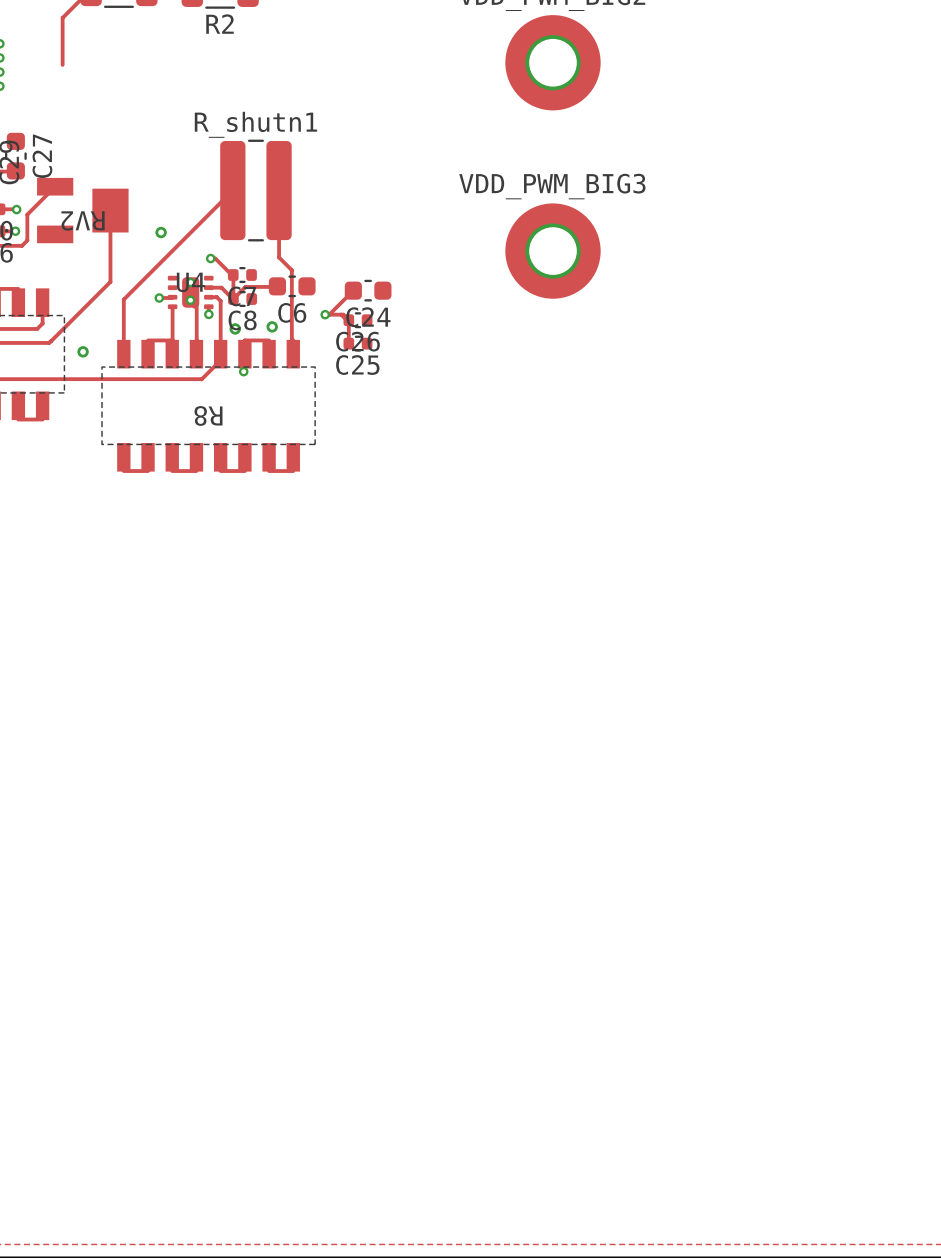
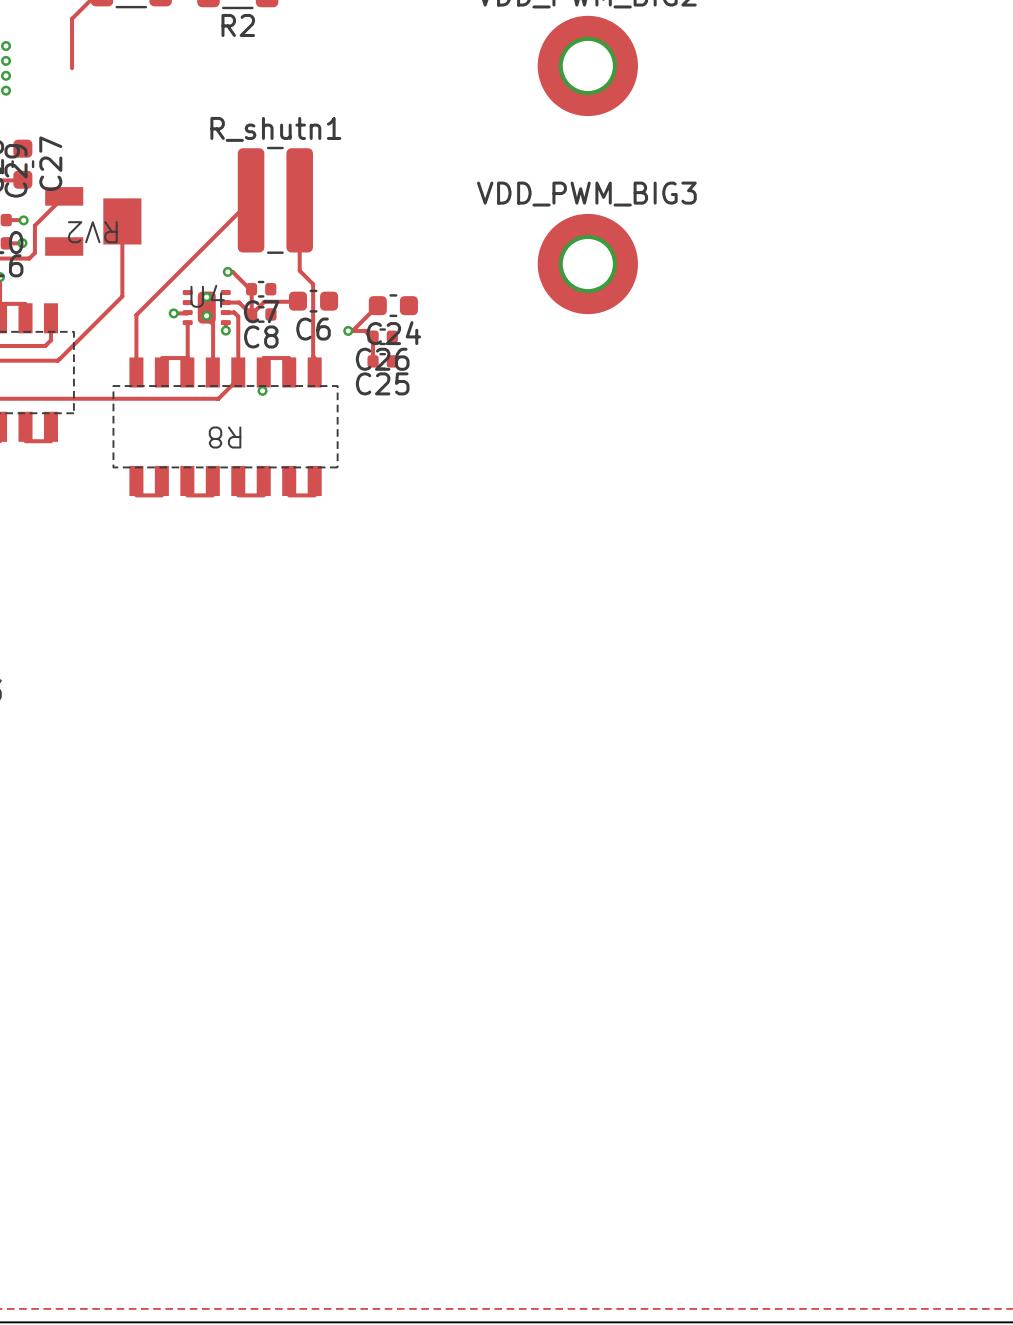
via: (161, 232) -> none
via: (272, 326) -> none
via: (235, 328) -> none
via: (83, 351) -> none

